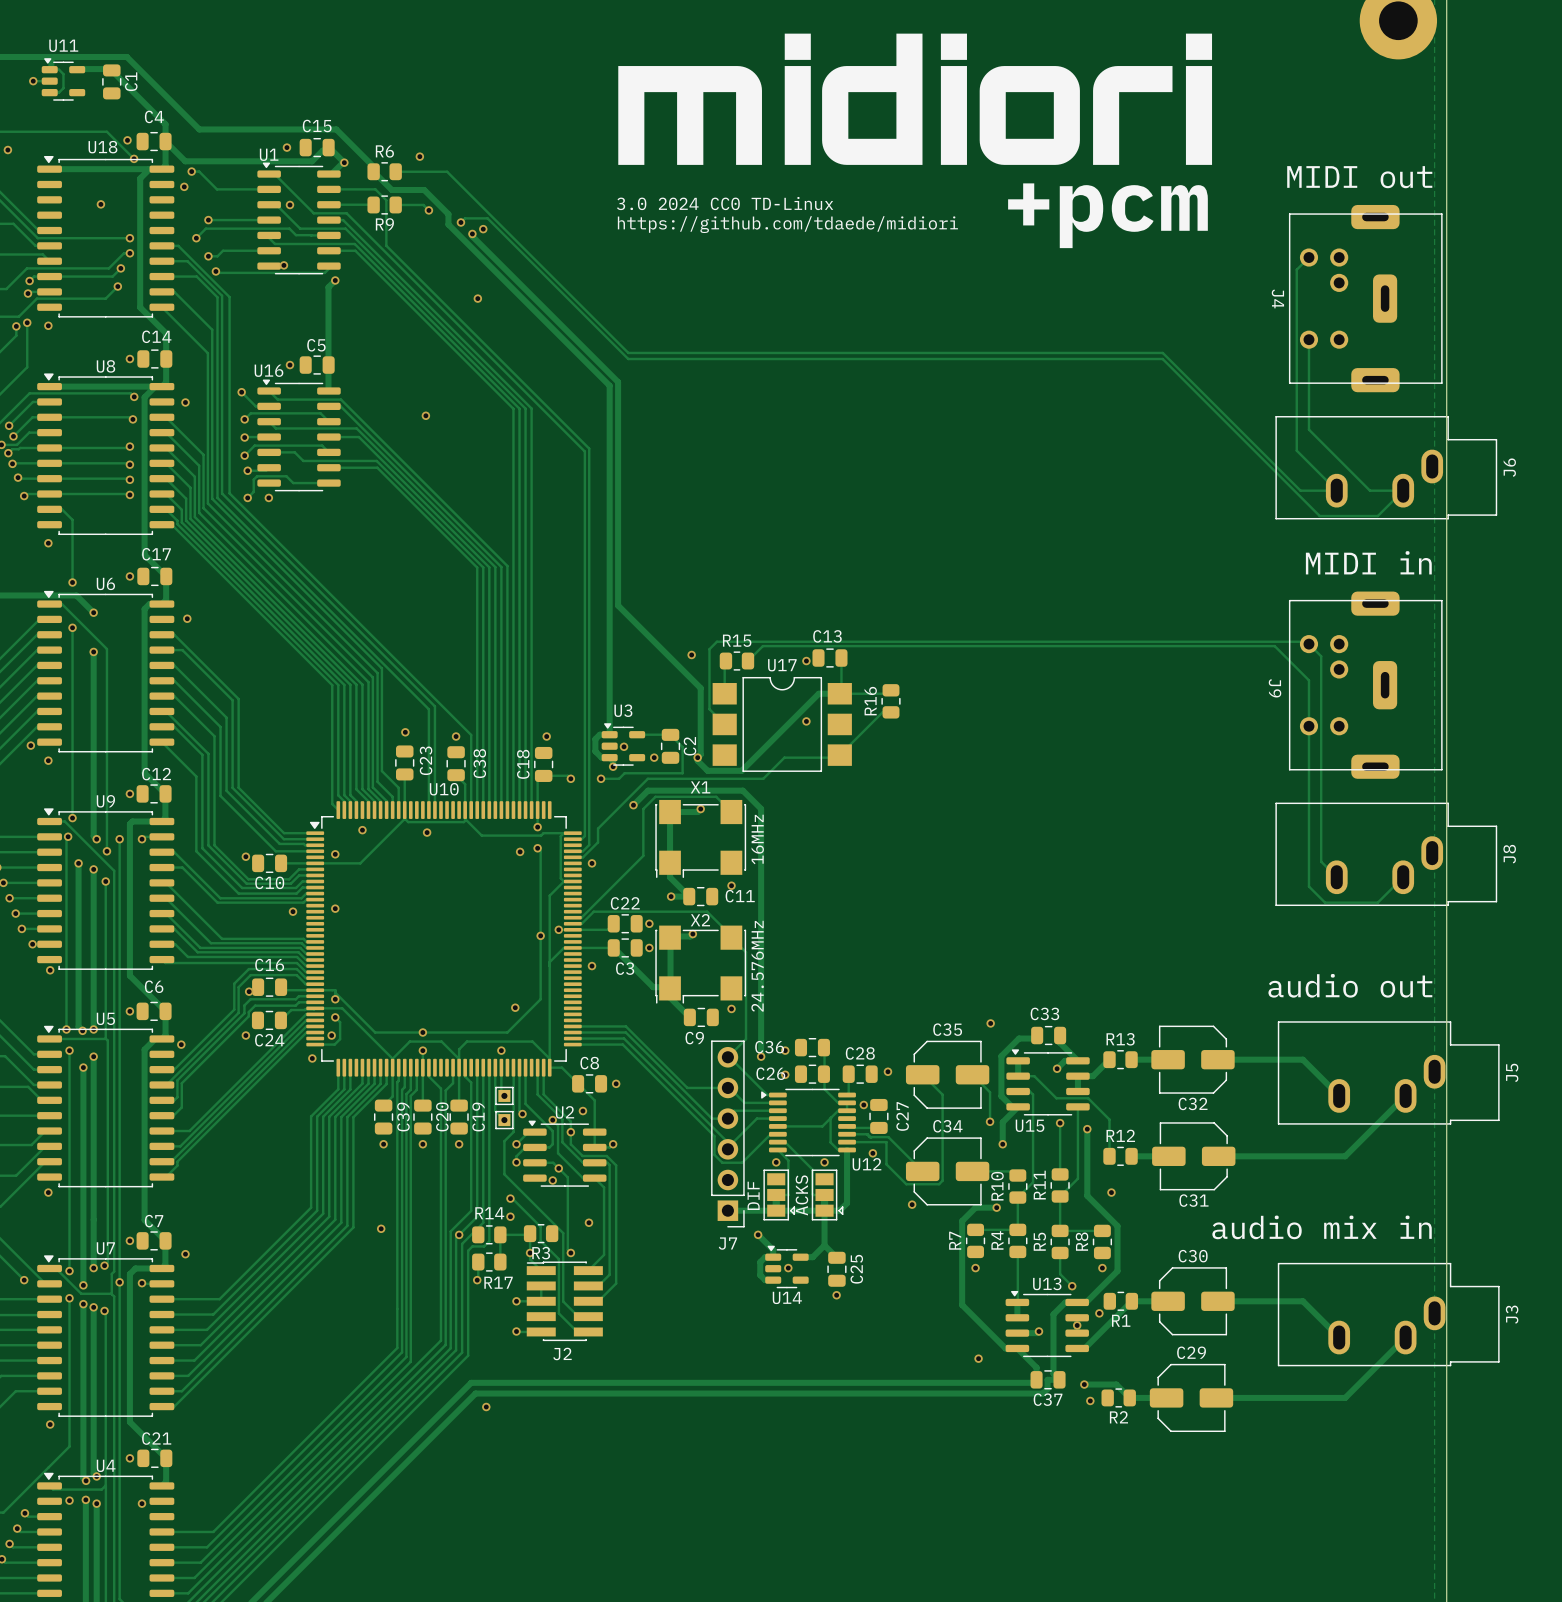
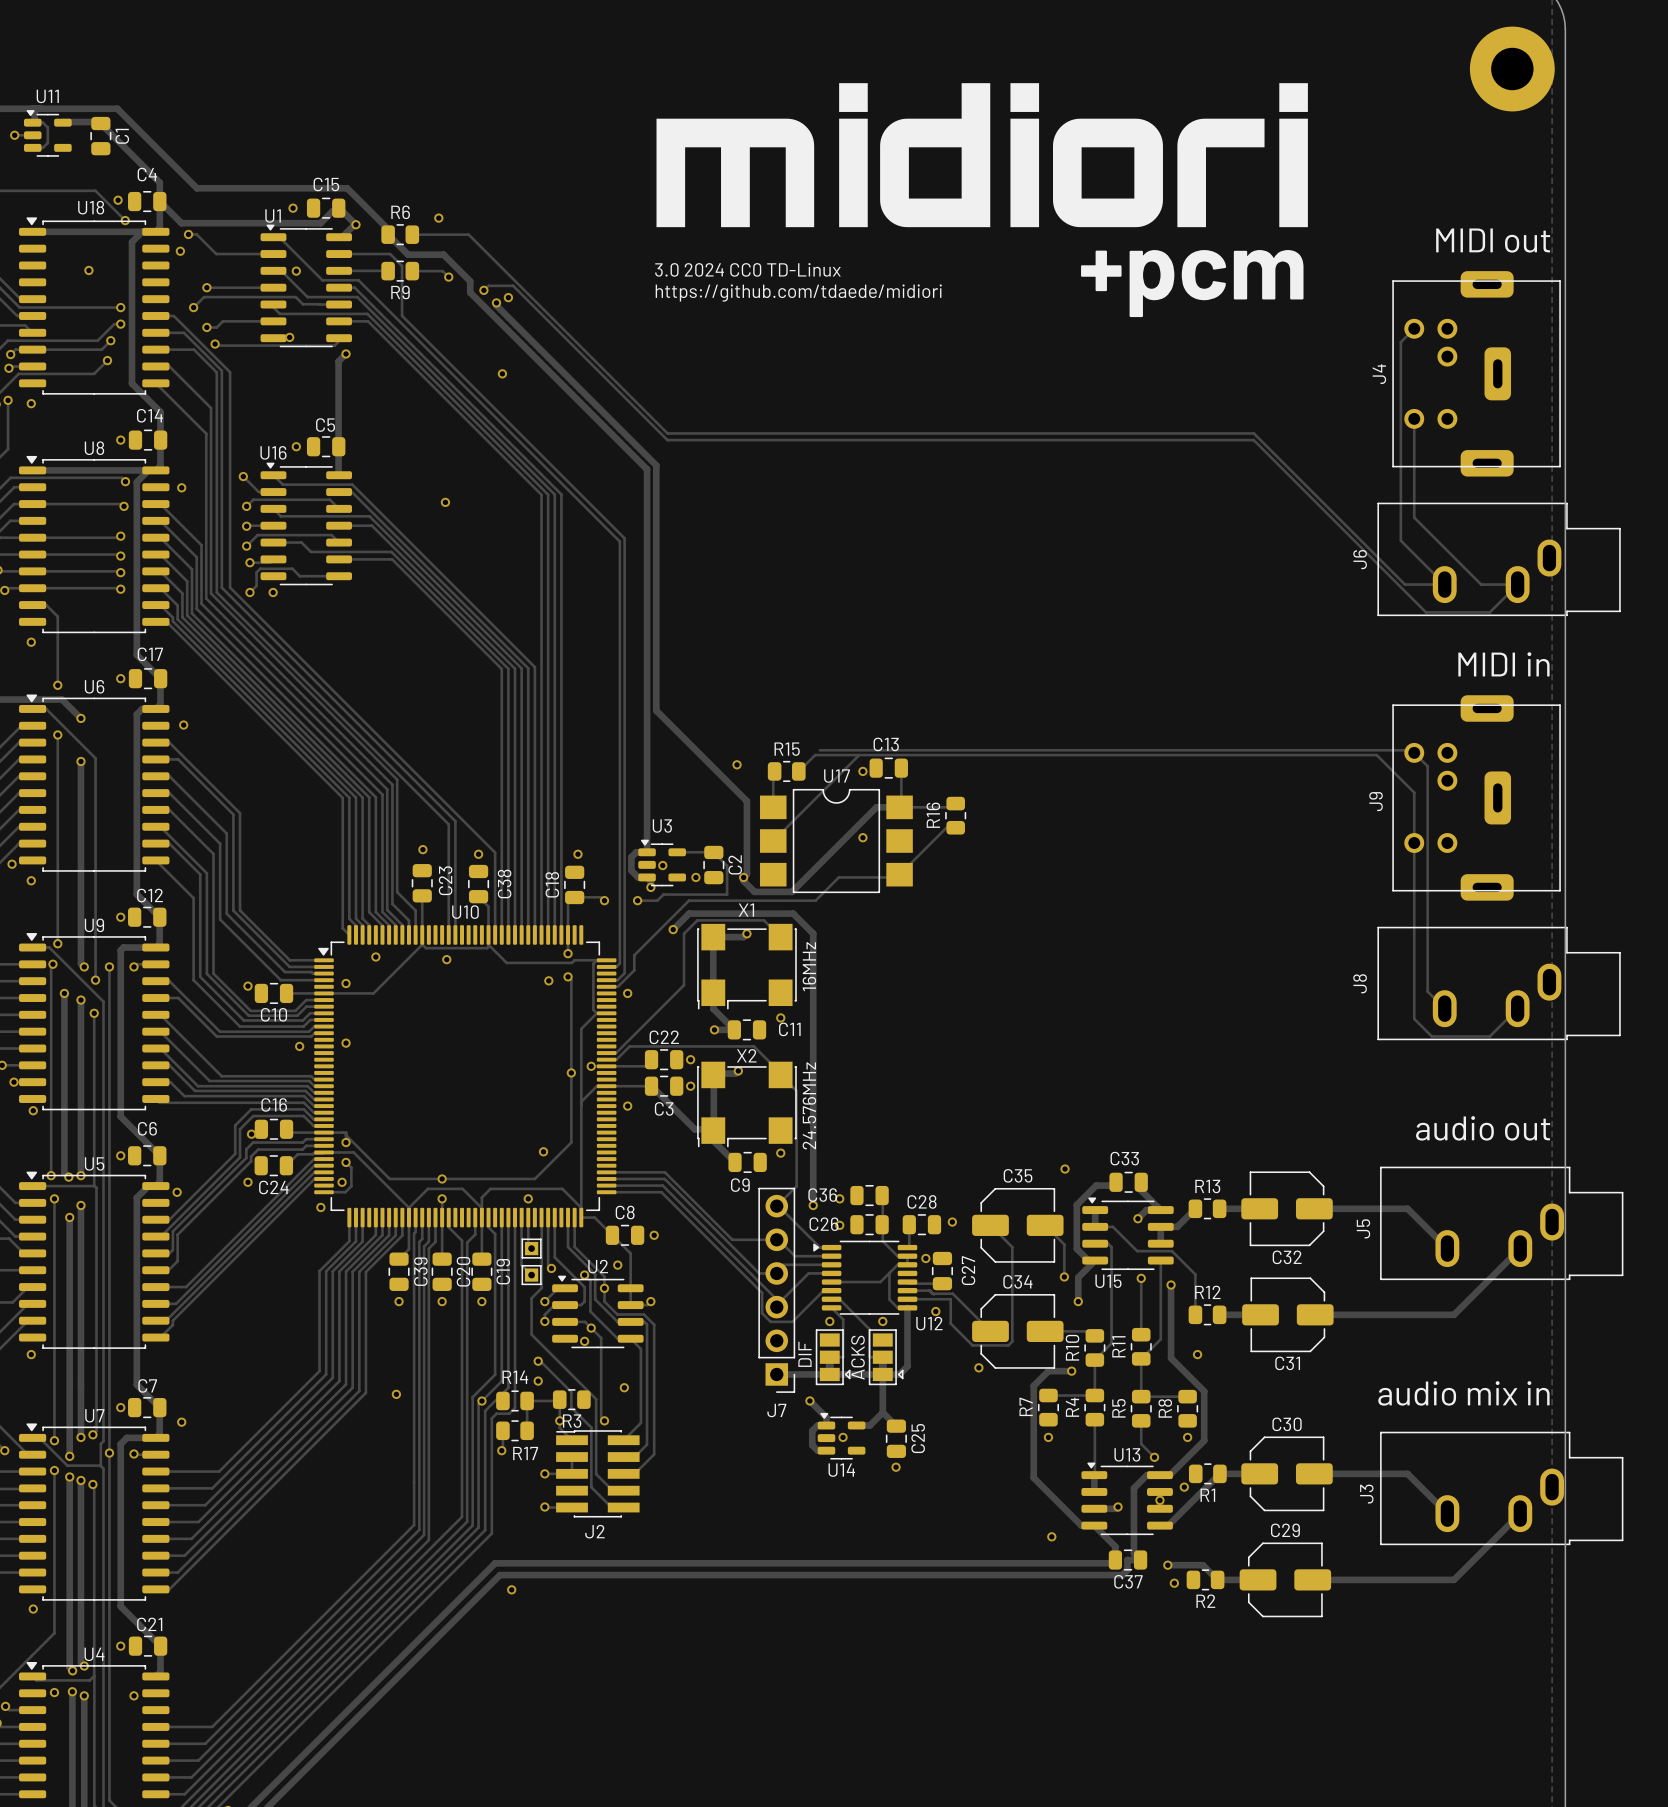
J4 name rotation: 0° (1277, 298) -> 180° (1379, 374)
J6 name position: J6 (1509, 467) -> J6 (1360, 559)
track: (767, 641) (716, 641) (709, 649) (709, 709) (724, 724) -> (859, 755) (773, 841)
J9 name rotation: 0° (1275, 688) -> 180° (1376, 801)
J8 name position: J8 (1509, 854) -> J8 (1360, 983)
J5 name position: J5 (1512, 1072) -> J5 (1363, 1228)
J3 name position: J3 (1512, 1314) -> J3 (1366, 1494)

